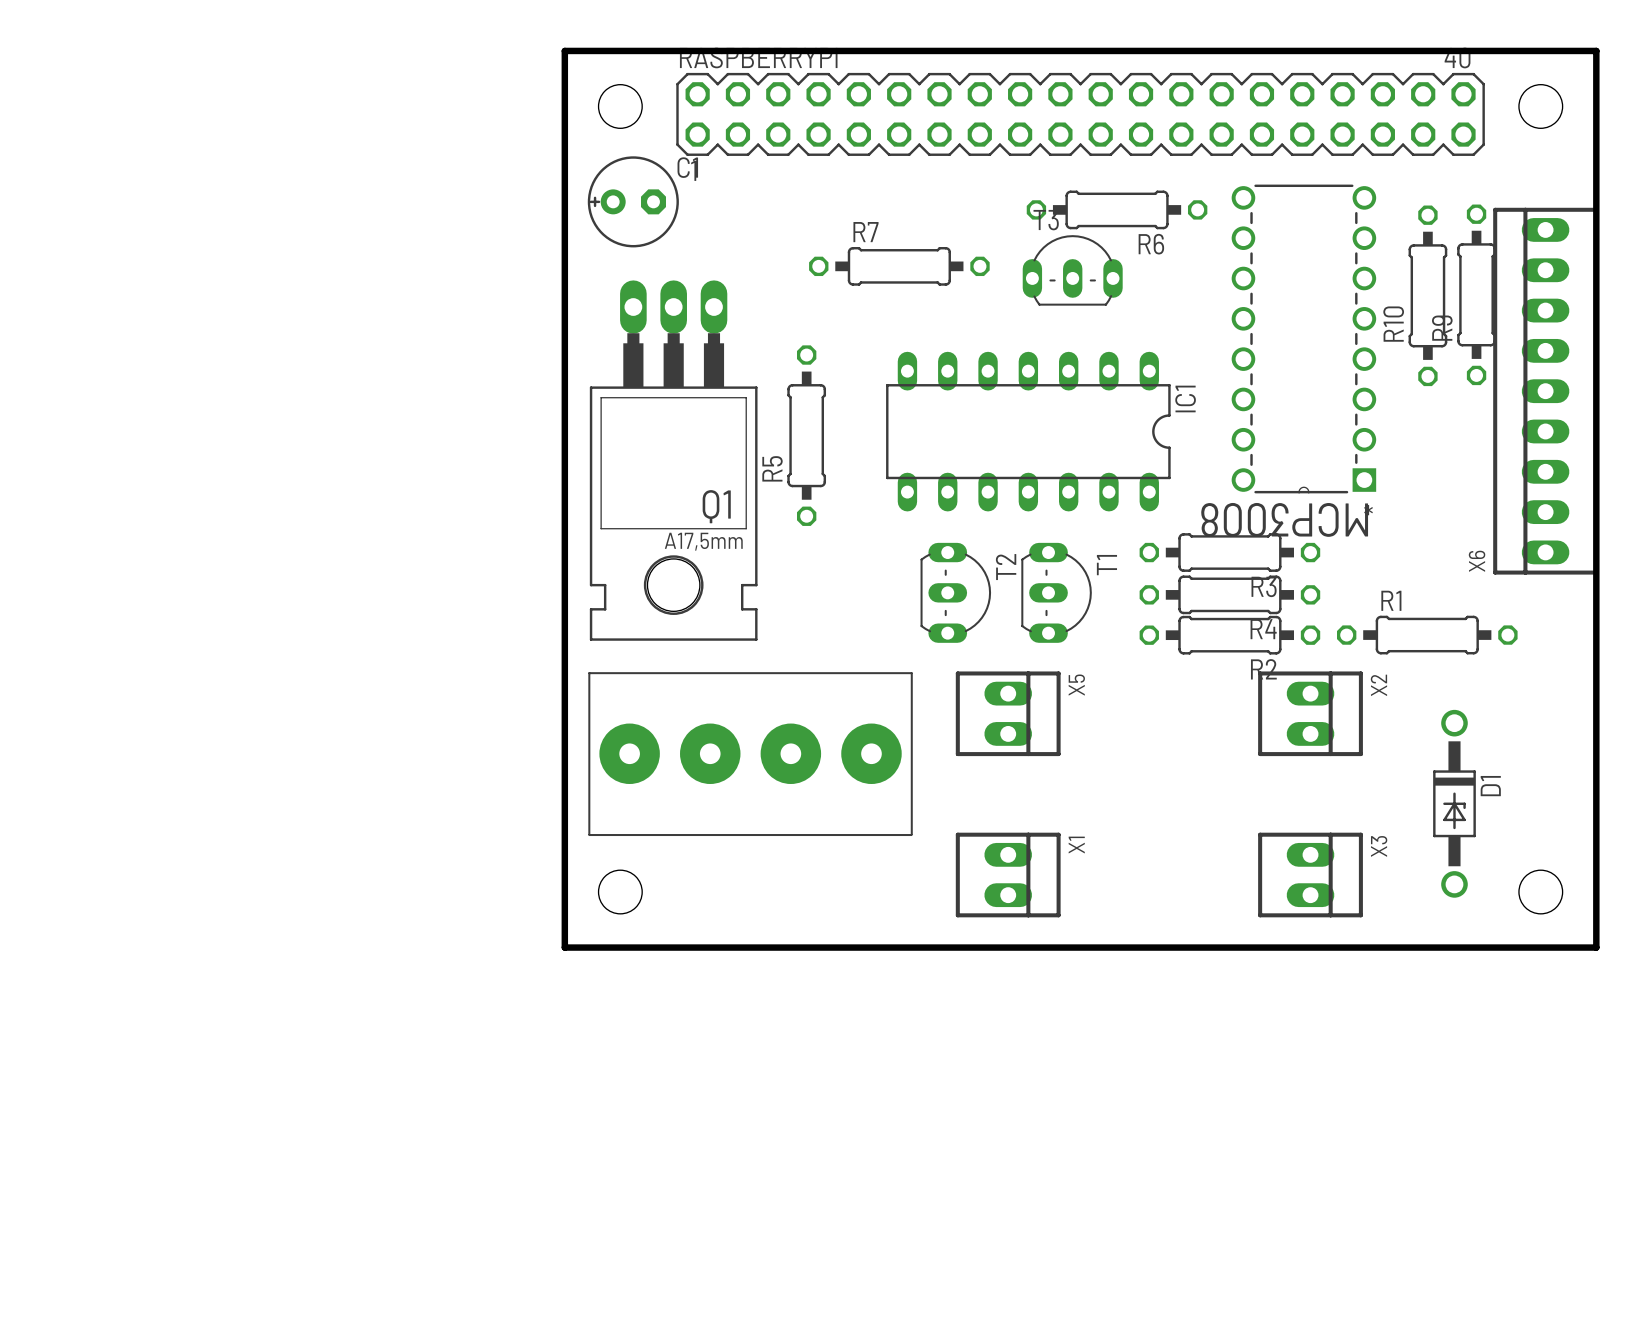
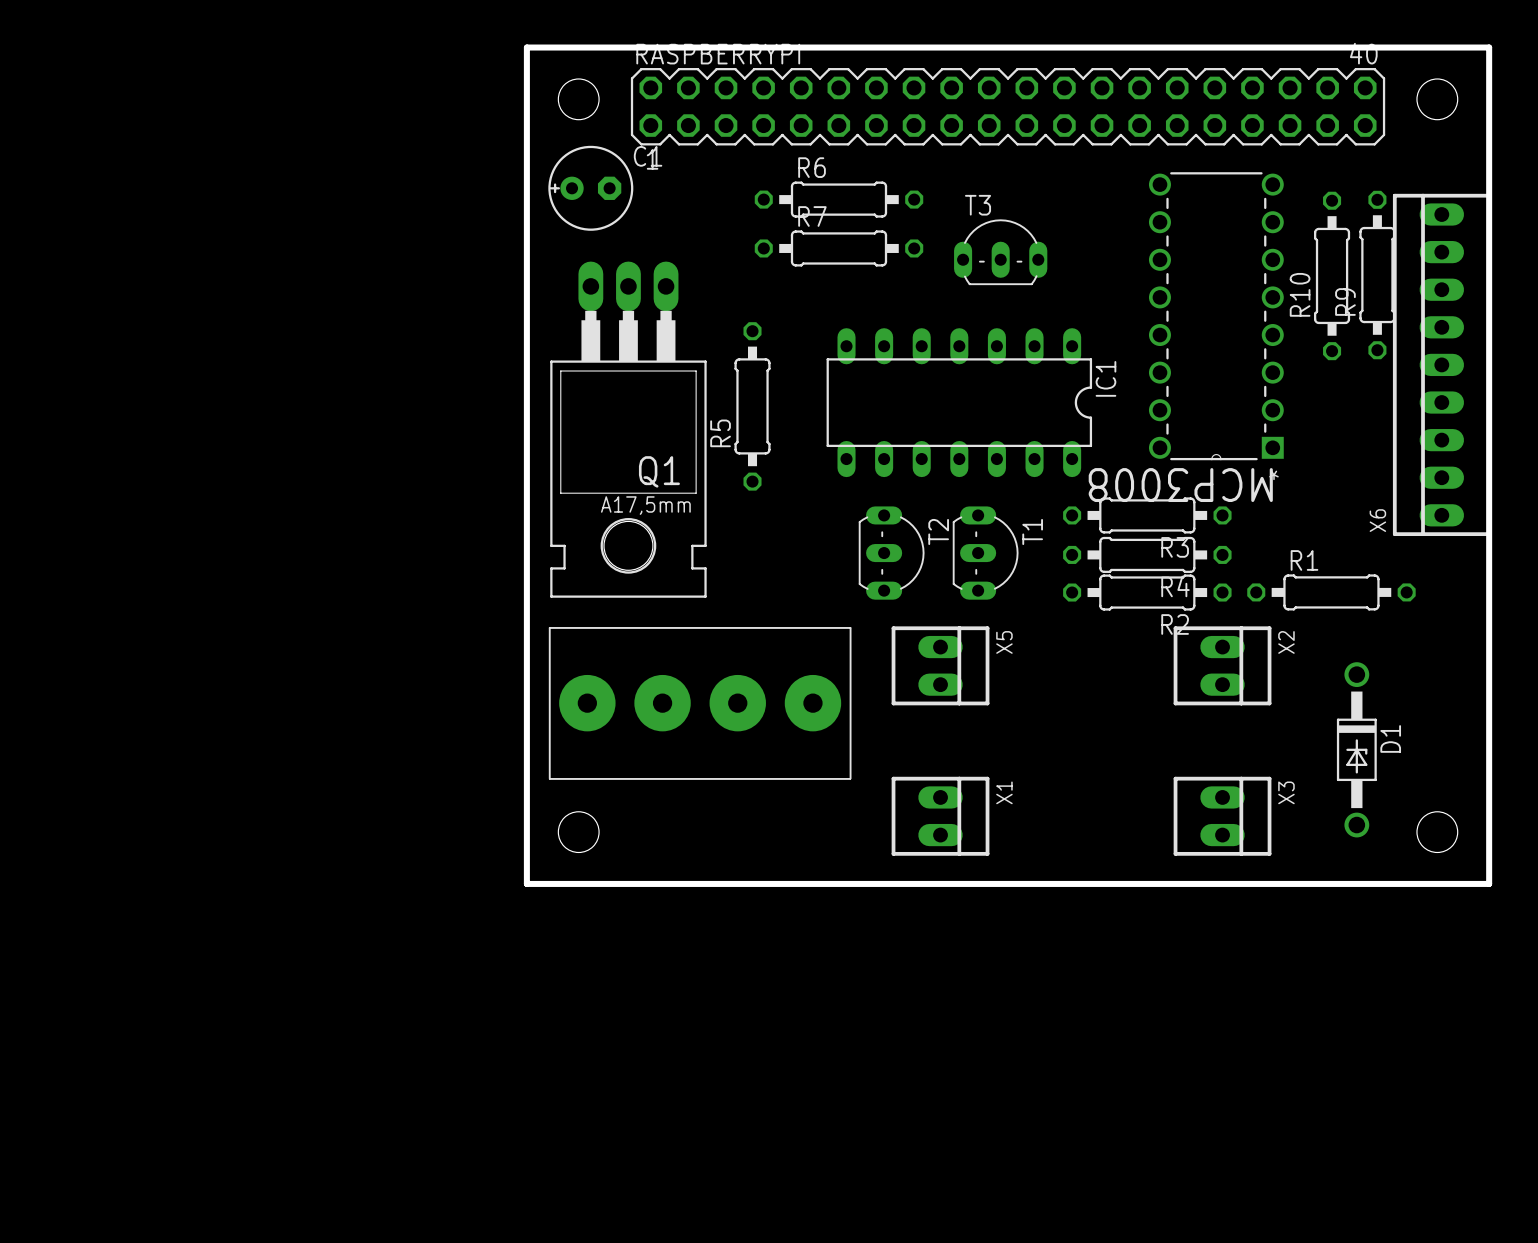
R6 position: (1117, 209) -> (838, 199)
R6 name position: R6 (1151, 244) -> R6 (812, 167)

